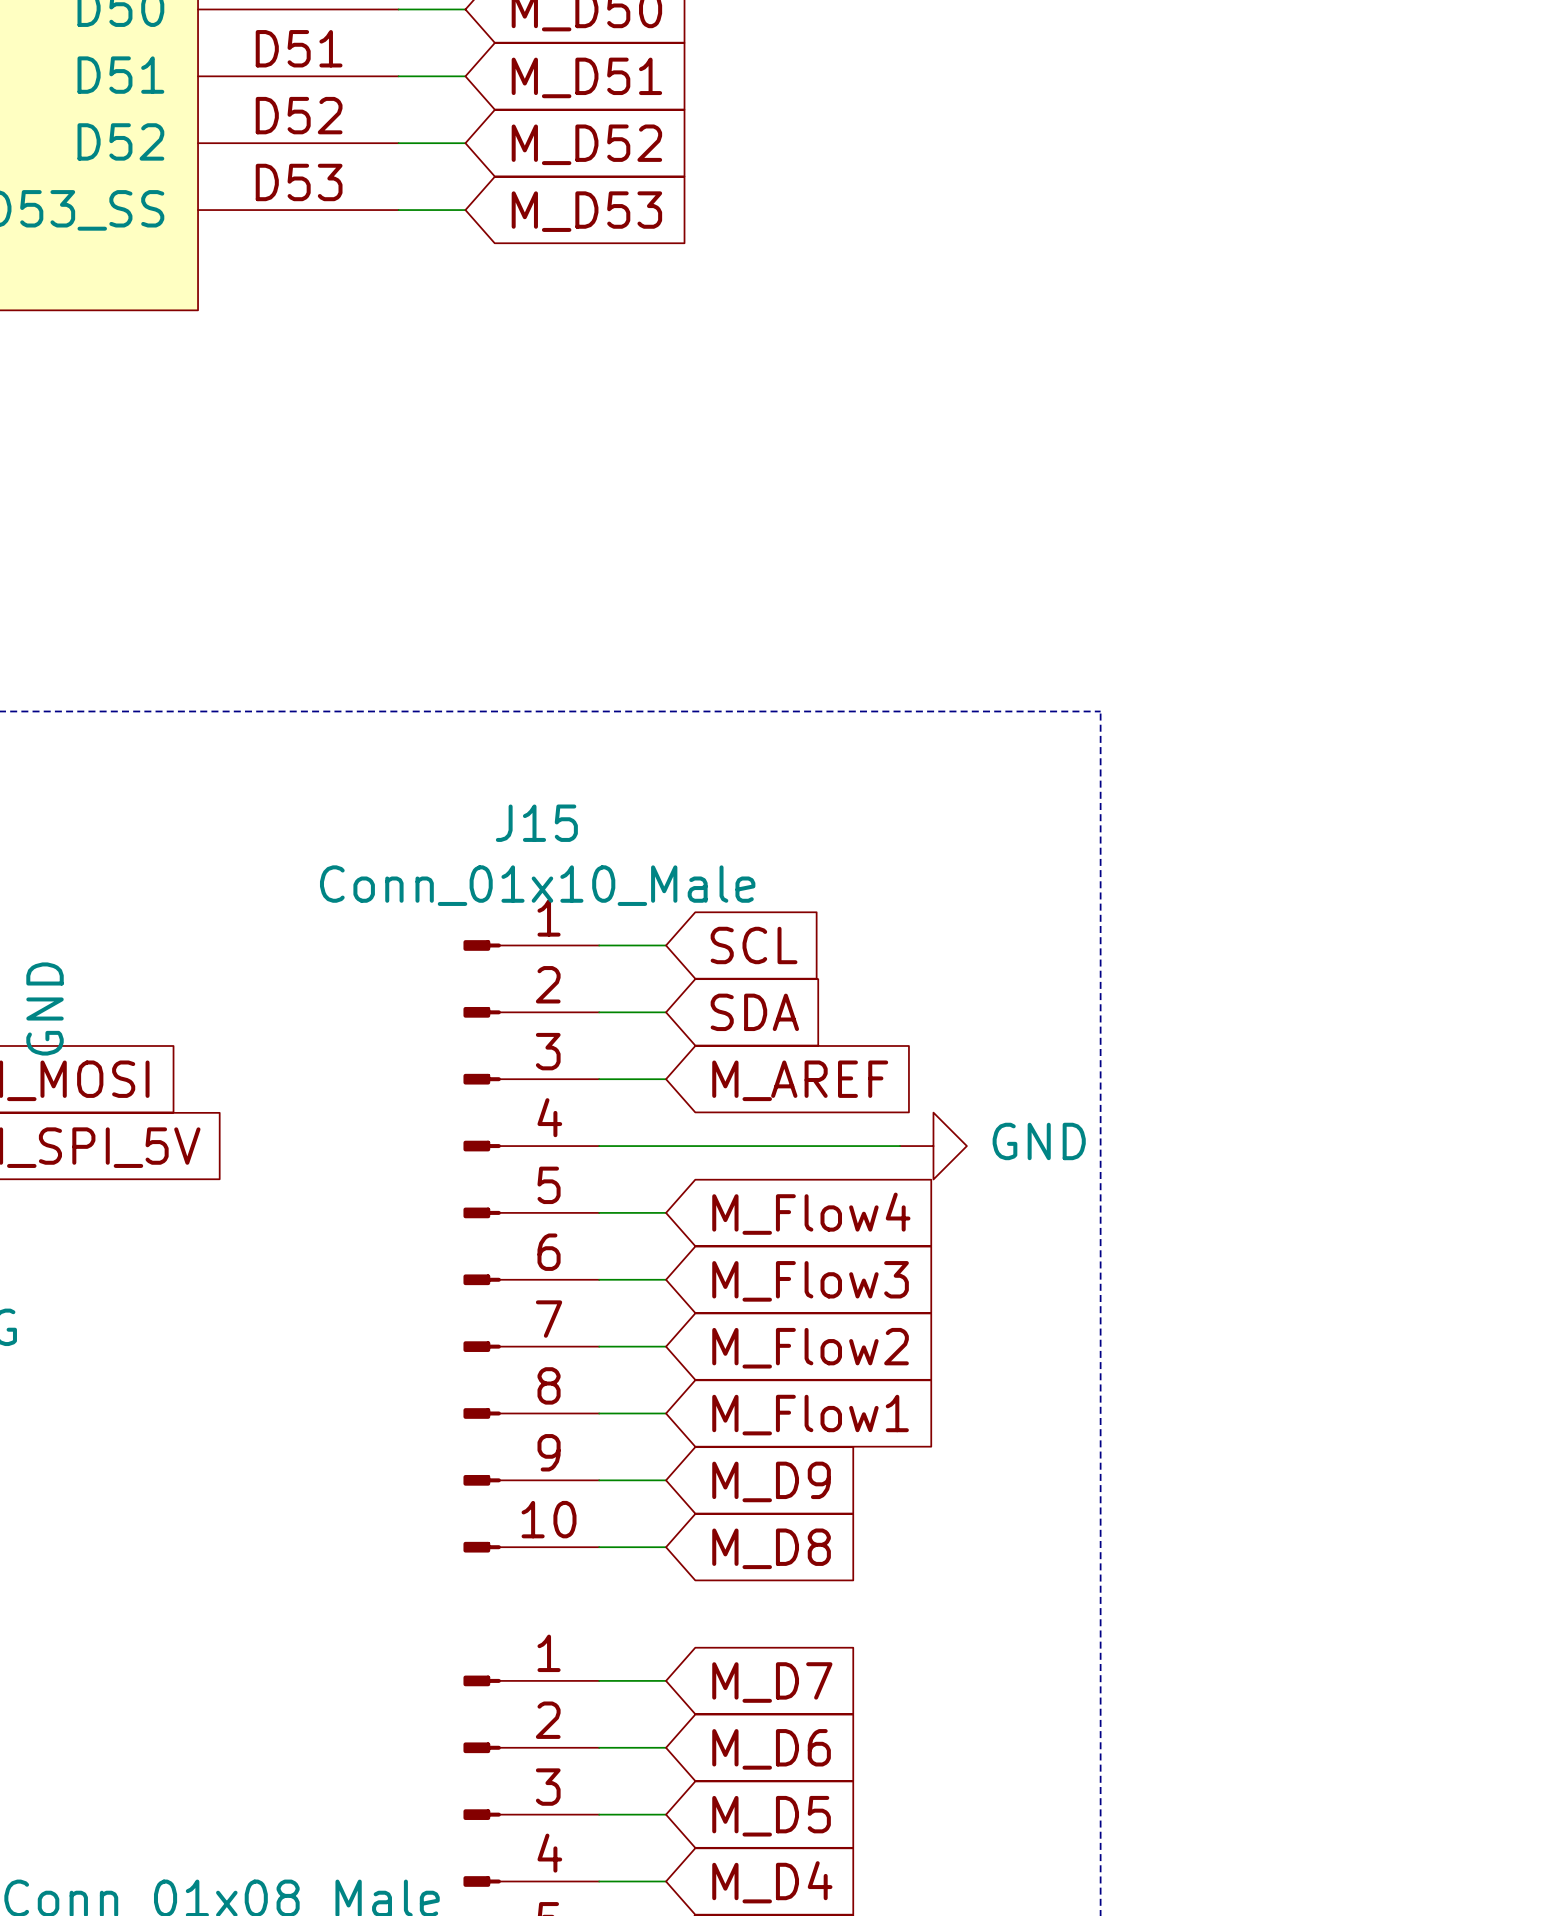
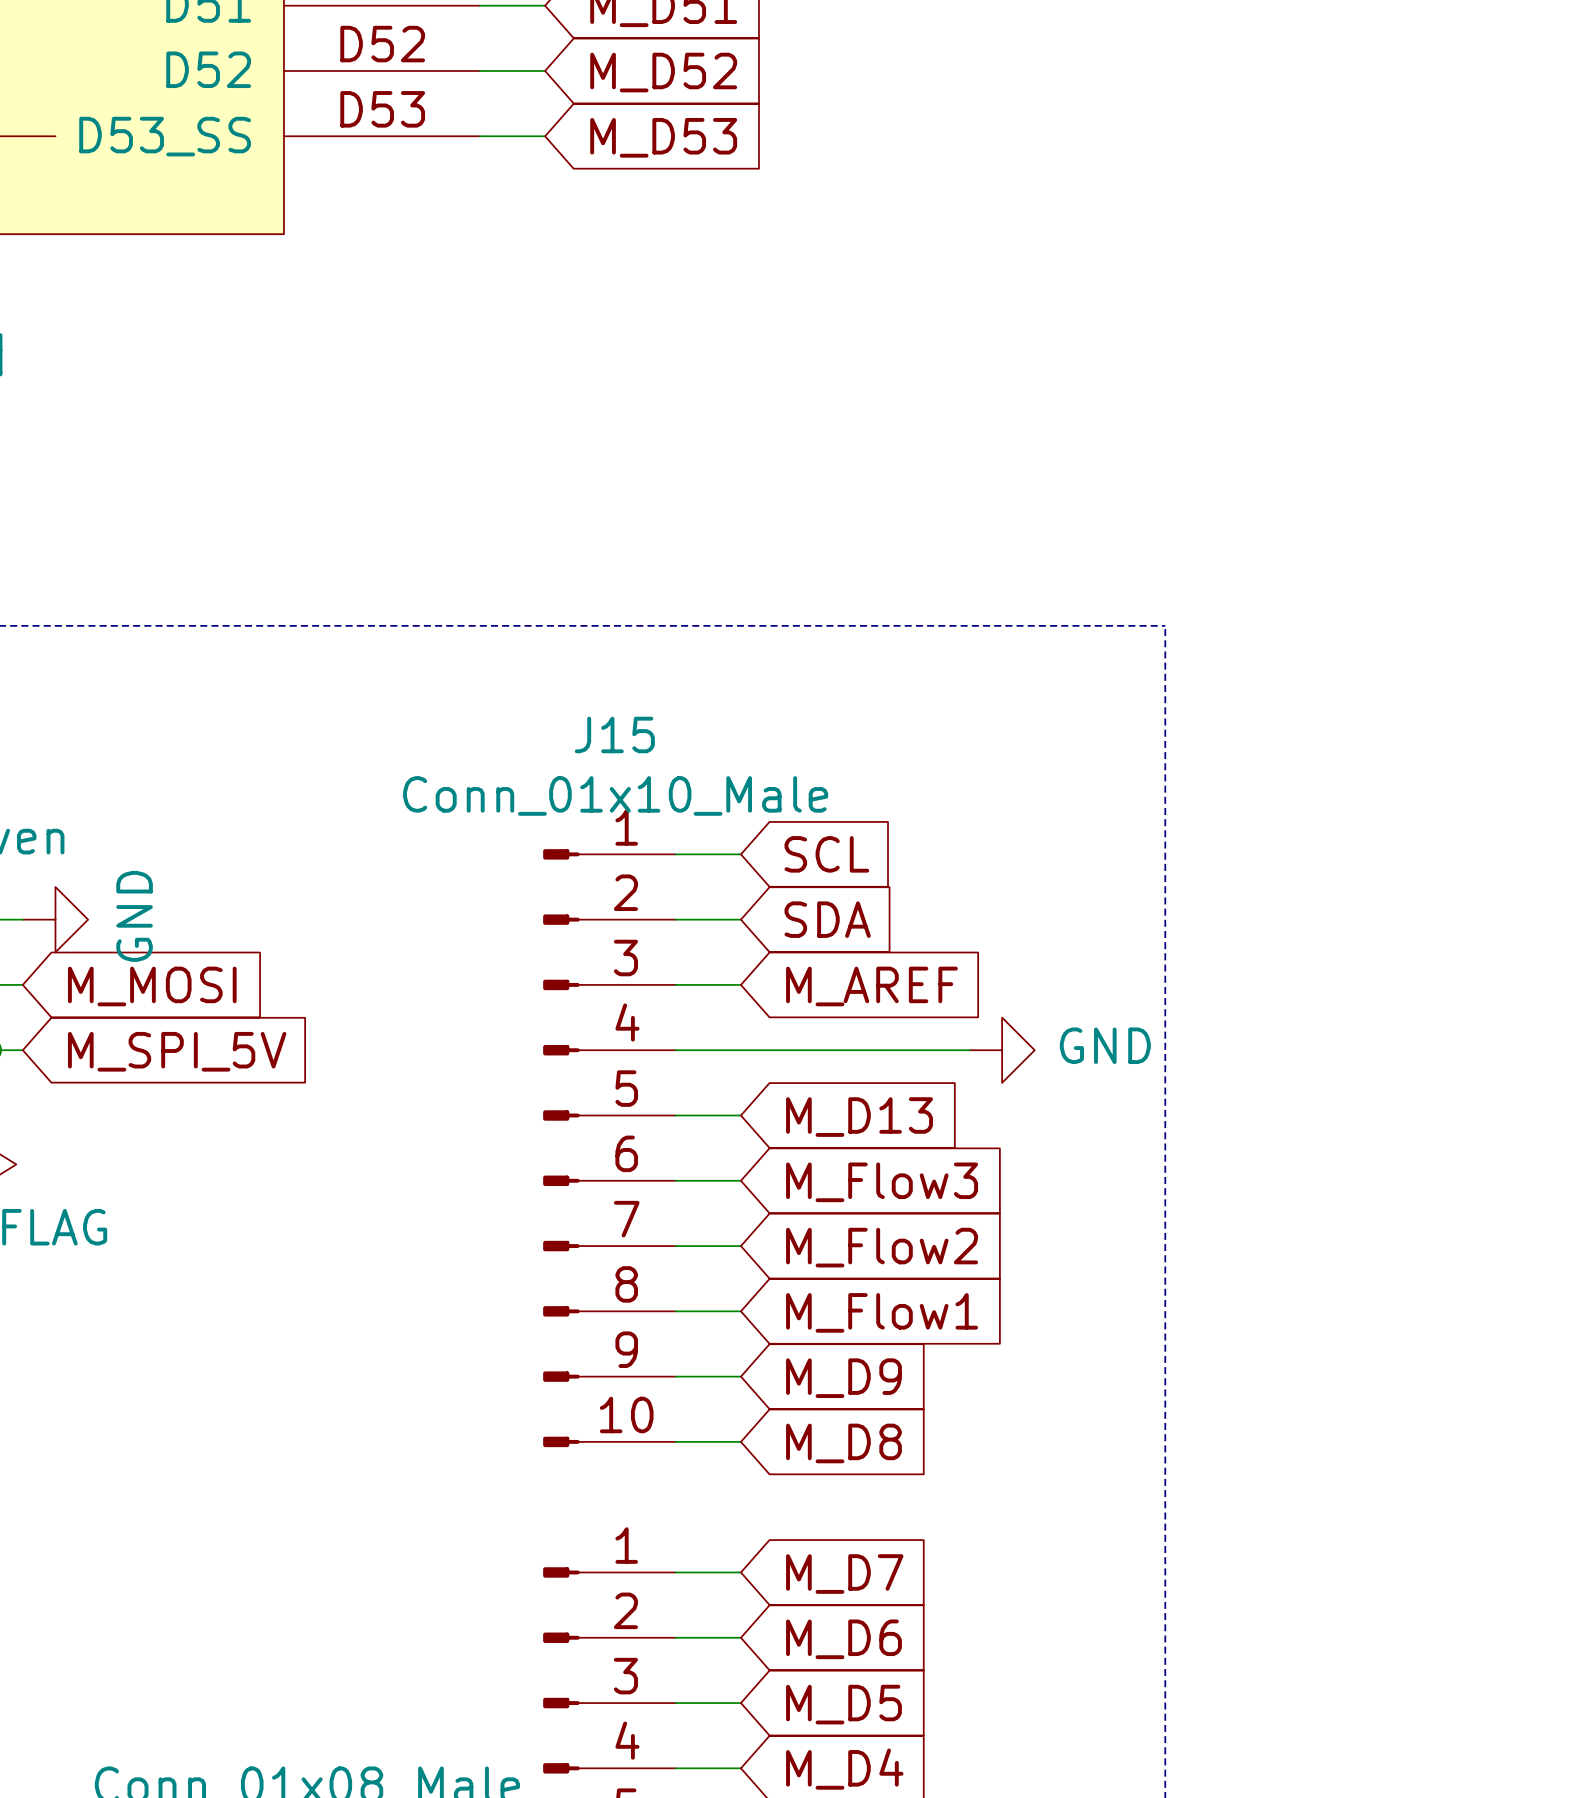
global label: M_Flow4 (811, 1213) -> M_D13 (859, 1117)

